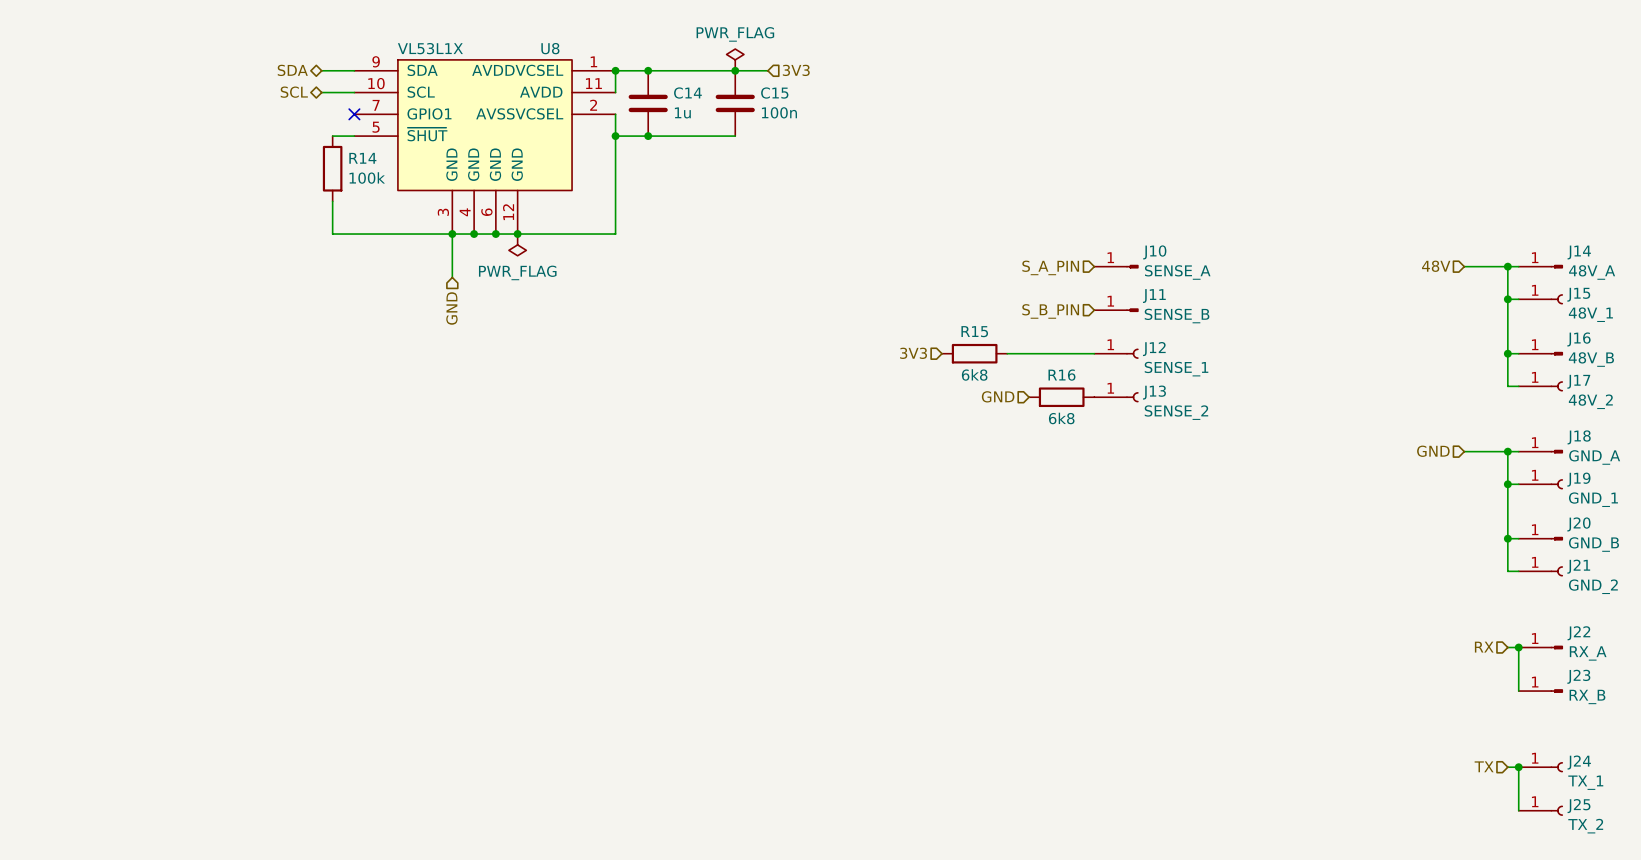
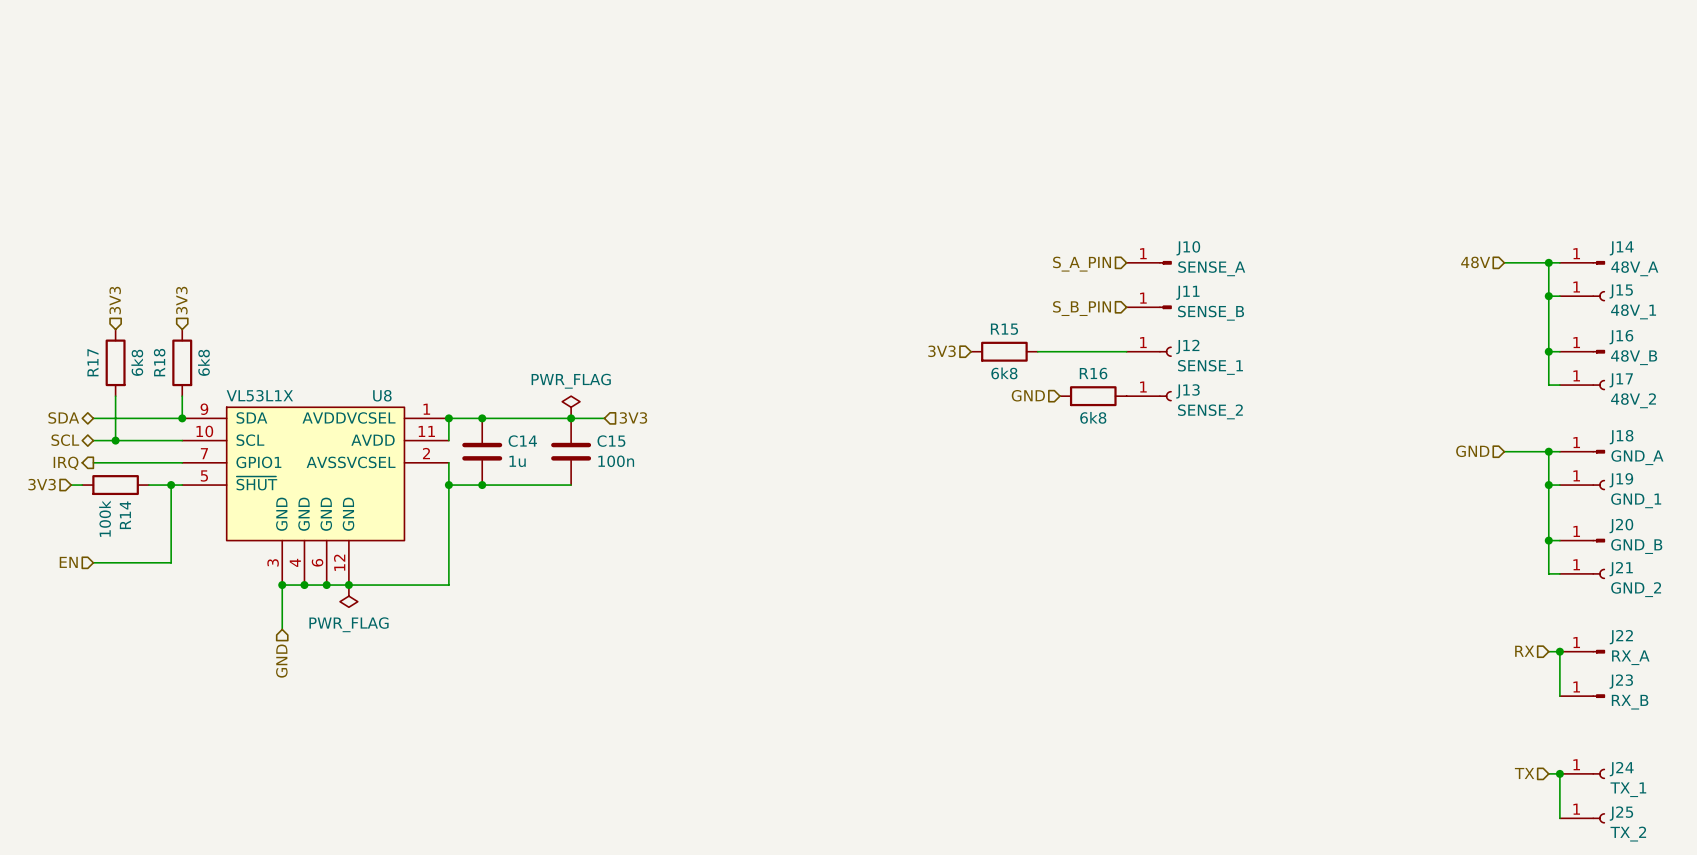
power symbol: PWR_FLAG (735, 59) -> none
hierarchical label: SDA (292, 70) -> none
wire: (321, 70) (354, 70) -> none
junction: (615, 70) -> none
junction: (648, 70) -> none
junction: (735, 70) -> none
wire: (767, 70) (615, 70) (615, 92) -> none
hierarchical label: 3V3 (796, 70) -> none
hierarchical label: SCL (294, 92) -> none
wire: (321, 92) (354, 92) -> none
C14 position: (648, 103) -> (482, 451)
C15 position: (735, 103) -> (571, 451)
no-connect mark: (354, 114) -> none
wire: (615, 114) (615, 234) (332, 234) (332, 201) -> none
wire: (332, 136) (354, 136) -> none
wire: (615, 136) (735, 136) -> none
junction: (615, 136) -> none
junction: (648, 136) -> none
U8 position: (484, 146) -> (315, 496)
R14 rotation: 0° (332, 168) -> 90° clockwise (115, 485)
R14 position: (332, 168) -> (115, 485)
wire: (452, 234) (452, 277) -> none
junction: (452, 234) -> none
junction: (474, 234) -> none
junction: (495, 234) -> none
junction: (517, 234) -> none
power symbol rotation: 0° (517, 244) -> 180° (571, 407)
power symbol position: PWR_FLAG (517, 244) -> PWR_FLAG (571, 407)
hierarchical label: none -> 3V3 (115, 300)
hierarchical label: none -> 3V3 (181, 300)
hierarchical label: GND (451, 308) -> none
R17: none -> 6k8 (115, 362)
R18: none -> 6k8 (182, 362)
wire: none -> (115, 396) (115, 440)
wire: none -> (182, 396) (182, 418) (93, 418)
hierarchical label: none -> SDA (63, 417)
hierarchical label: none -> 3V3 (633, 417)
junction: none -> (182, 418)
junction: none -> (448, 418)
junction: none -> (482, 418)
junction: none -> (571, 418)
wire: none -> (604, 418) (448, 418) (448, 440)
hierarchical label: none -> SCL (65, 440)
wire: none -> (93, 440) (182, 440)
junction: none -> (115, 440)
hierarchical label: none -> IRQ (66, 463)
wire: none -> (93, 462) (182, 462)
wire: none -> (448, 462) (448, 585) (282, 585) (282, 629)
hierarchical label: none -> 3V3 (42, 484)
wire: none -> (71, 485) (82, 485)
wire: none -> (148, 485) (182, 485)
wire: none -> (171, 485) (171, 562) (93, 562)
junction: none -> (171, 485)
wire: none -> (448, 485) (571, 485)
junction: none -> (448, 485)
junction: none -> (482, 485)
hierarchical label: none -> EN (68, 562)
junction: none -> (282, 585)
junction: none -> (304, 585)
junction: none -> (326, 585)
junction: none -> (348, 585)
power symbol: none -> PWR_FLAG (348, 596)
hierarchical label: none -> GND (281, 661)

